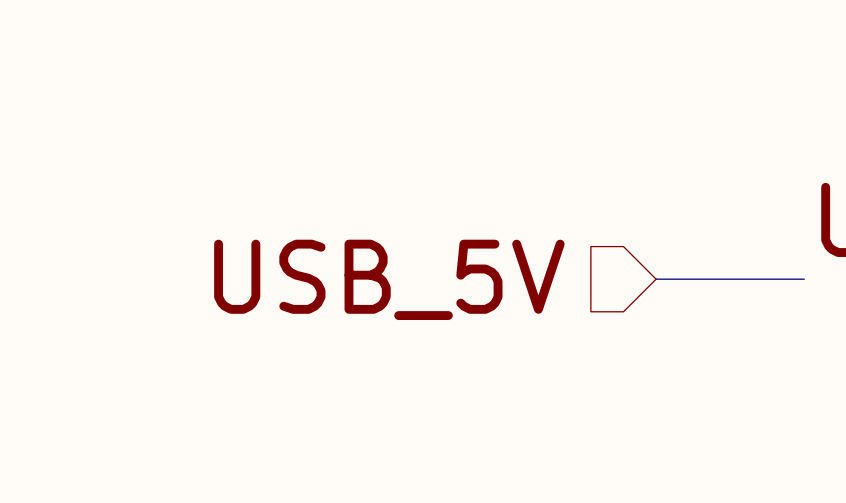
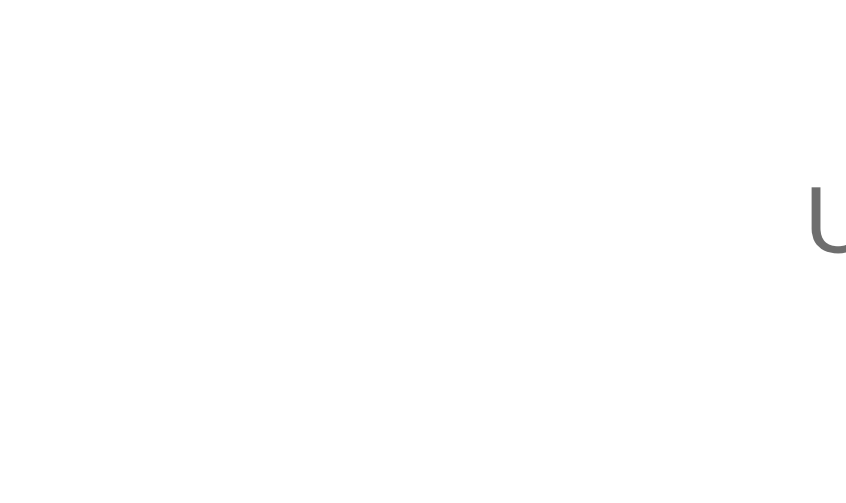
hierarchical label: USB_5V (389, 279) -> none
wire: (656, 279) (804, 279) -> none

